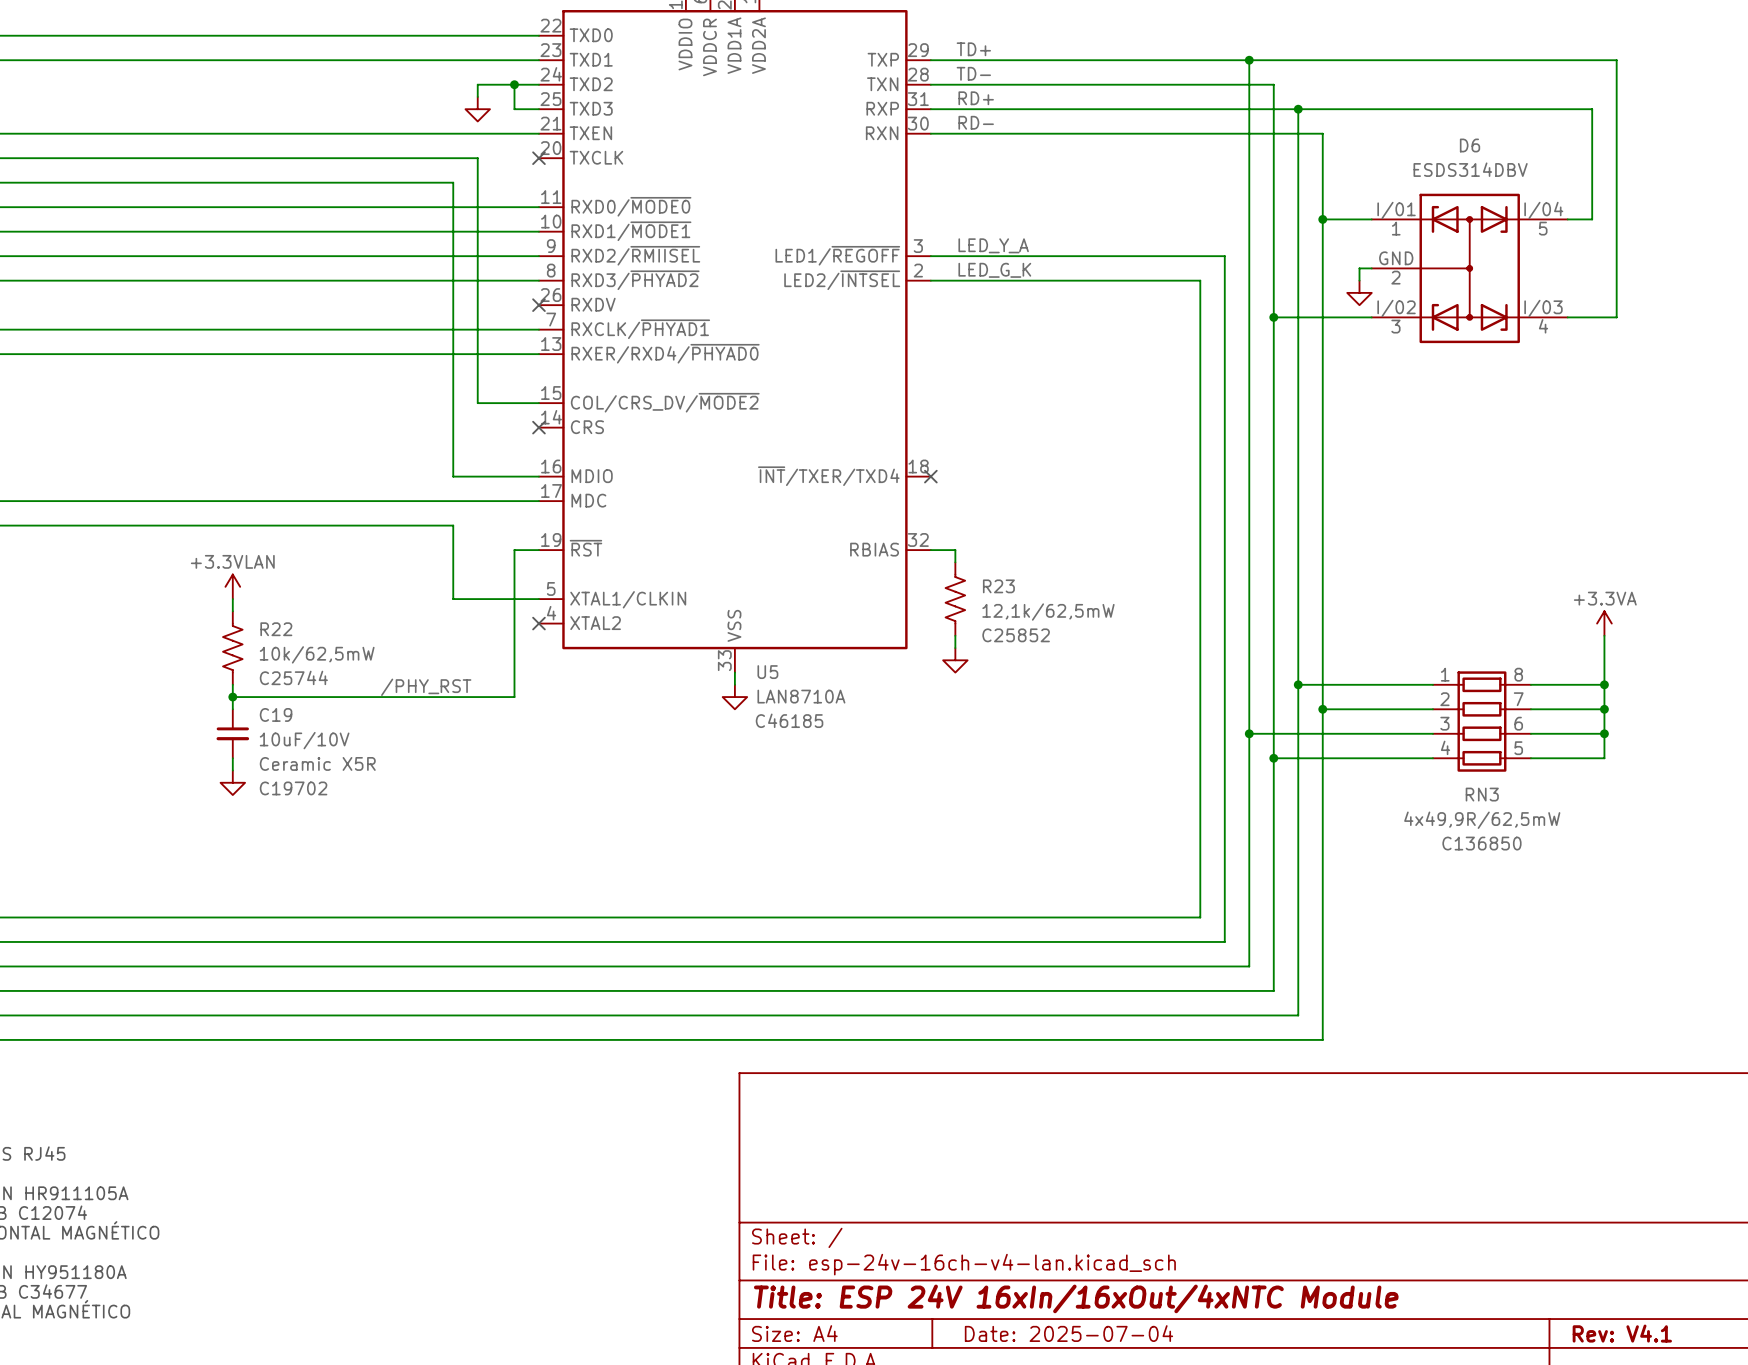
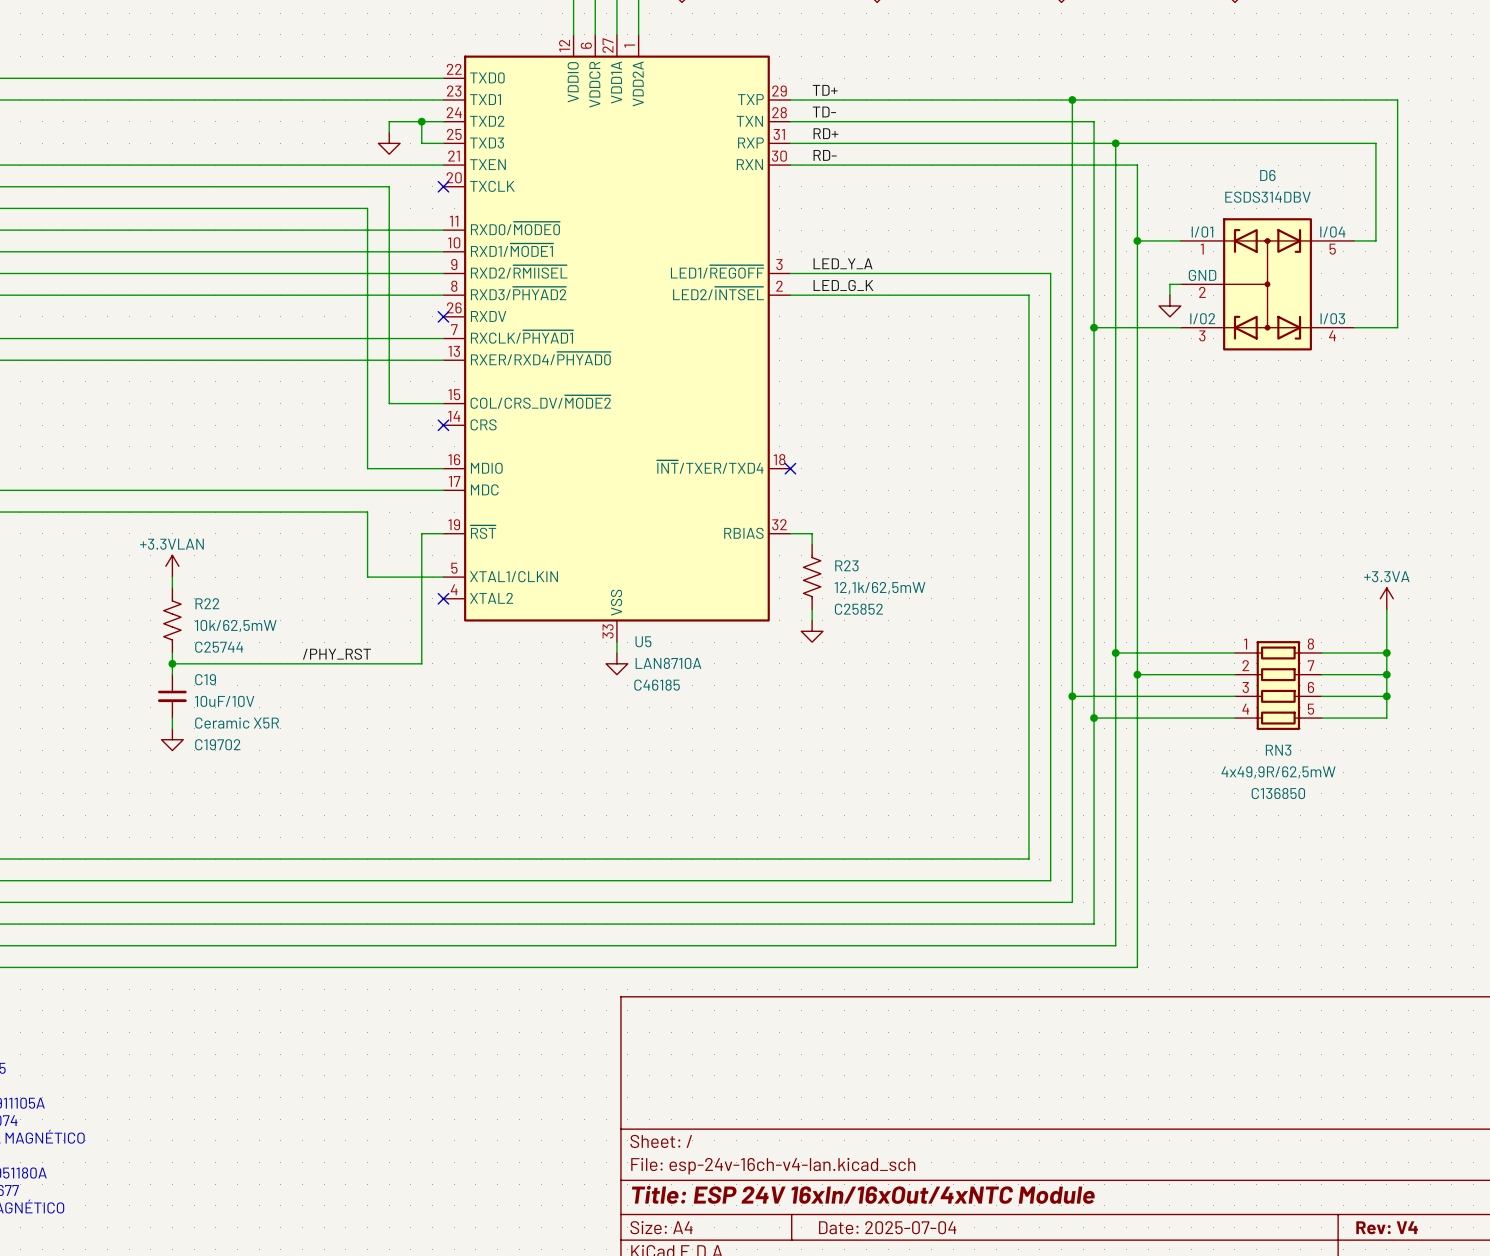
title block: Rev: V4.1 (1622, 1333) -> Rev: V4 (1387, 1227)

